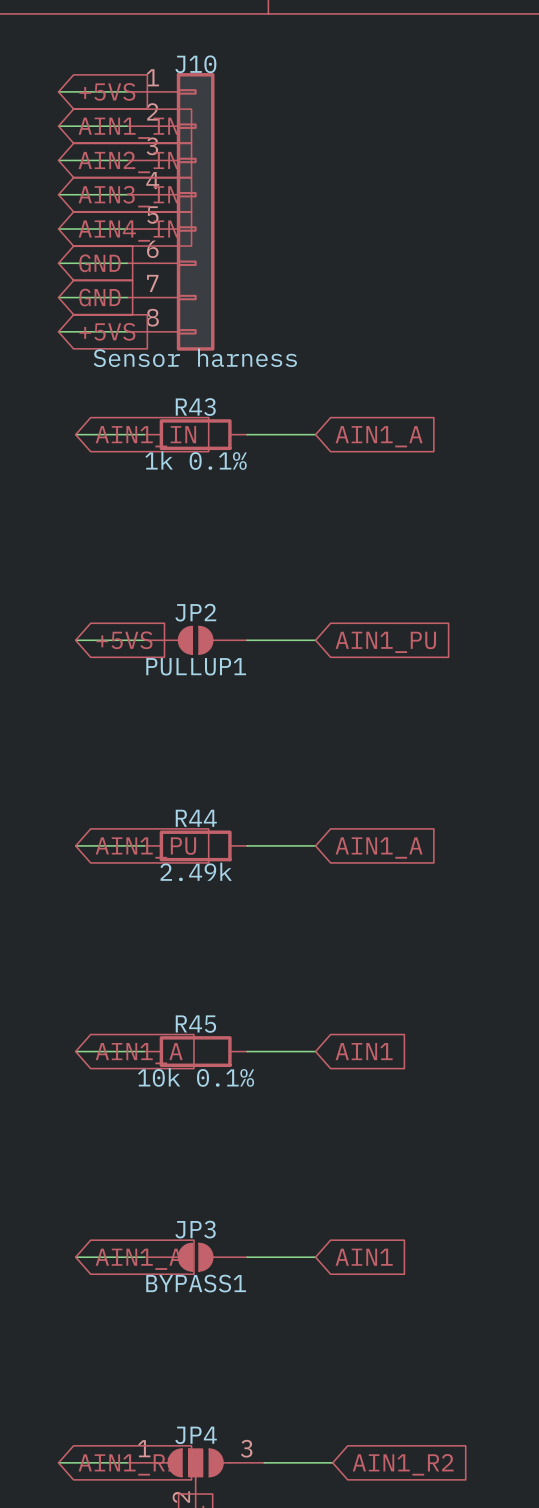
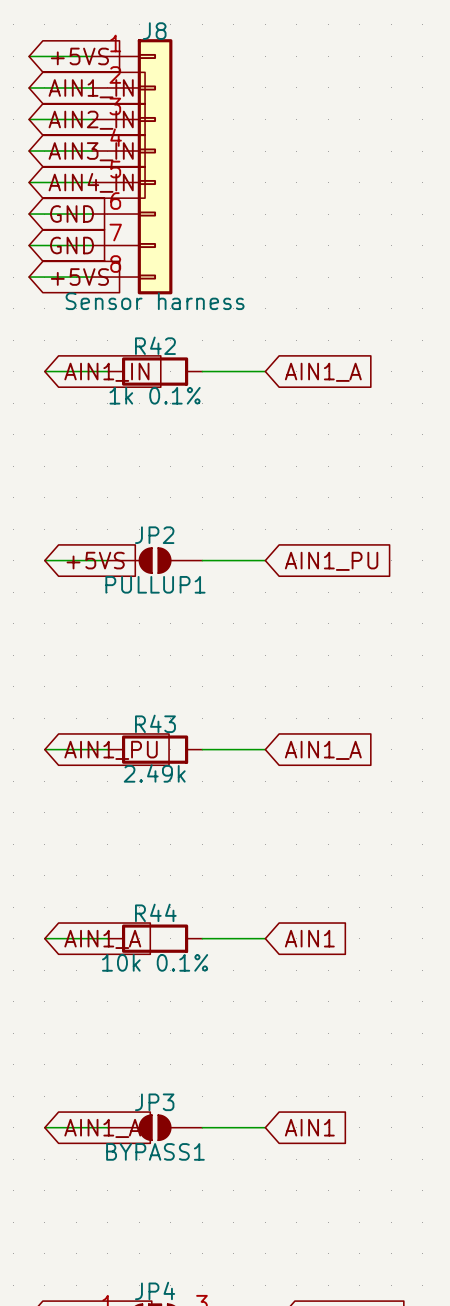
J10 name: J10 (195, 64) -> J8 (154, 31)
R43 name: R43 (195, 407) -> R42 (155, 345)
R44 name: R44 (196, 818) -> R43 (155, 723)
R45 name: R45 (195, 1024) -> R44 (155, 912)

